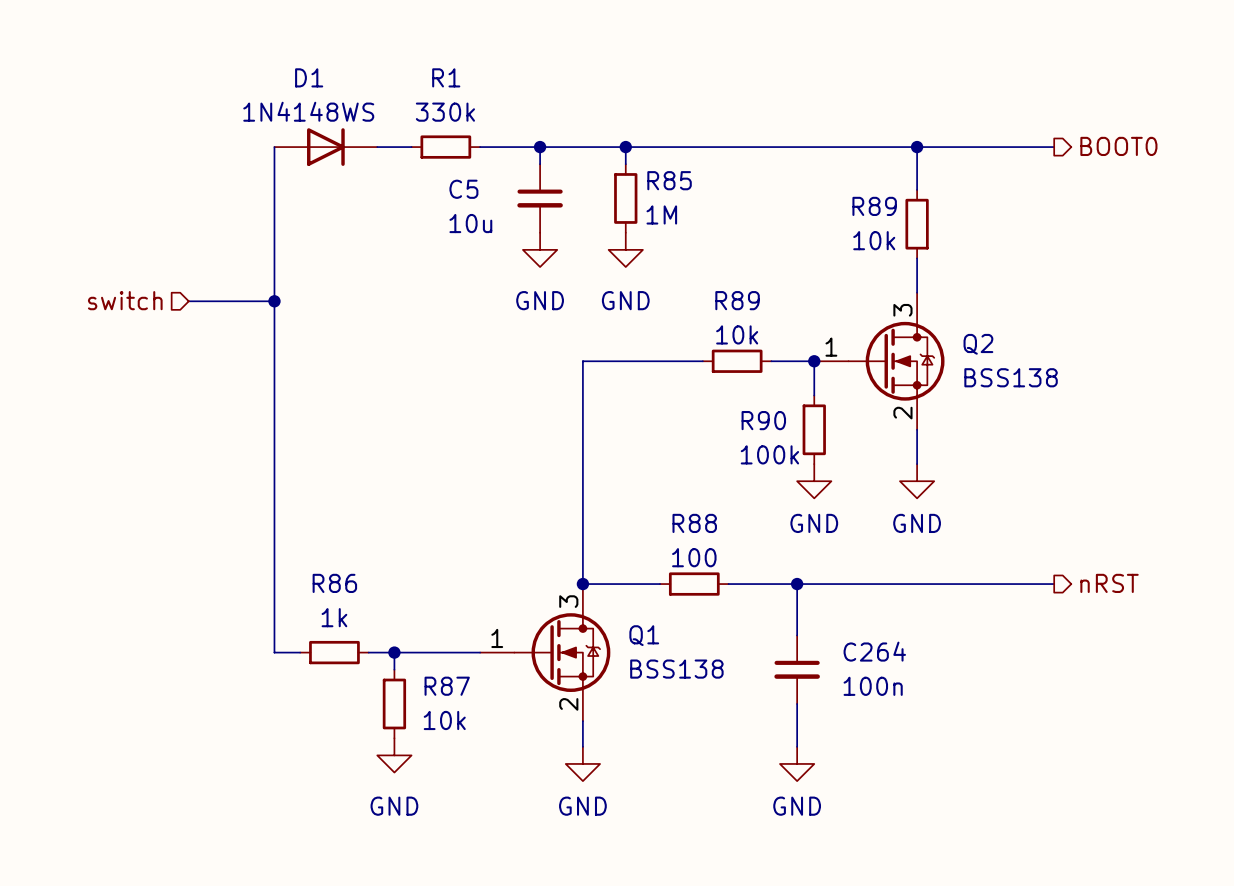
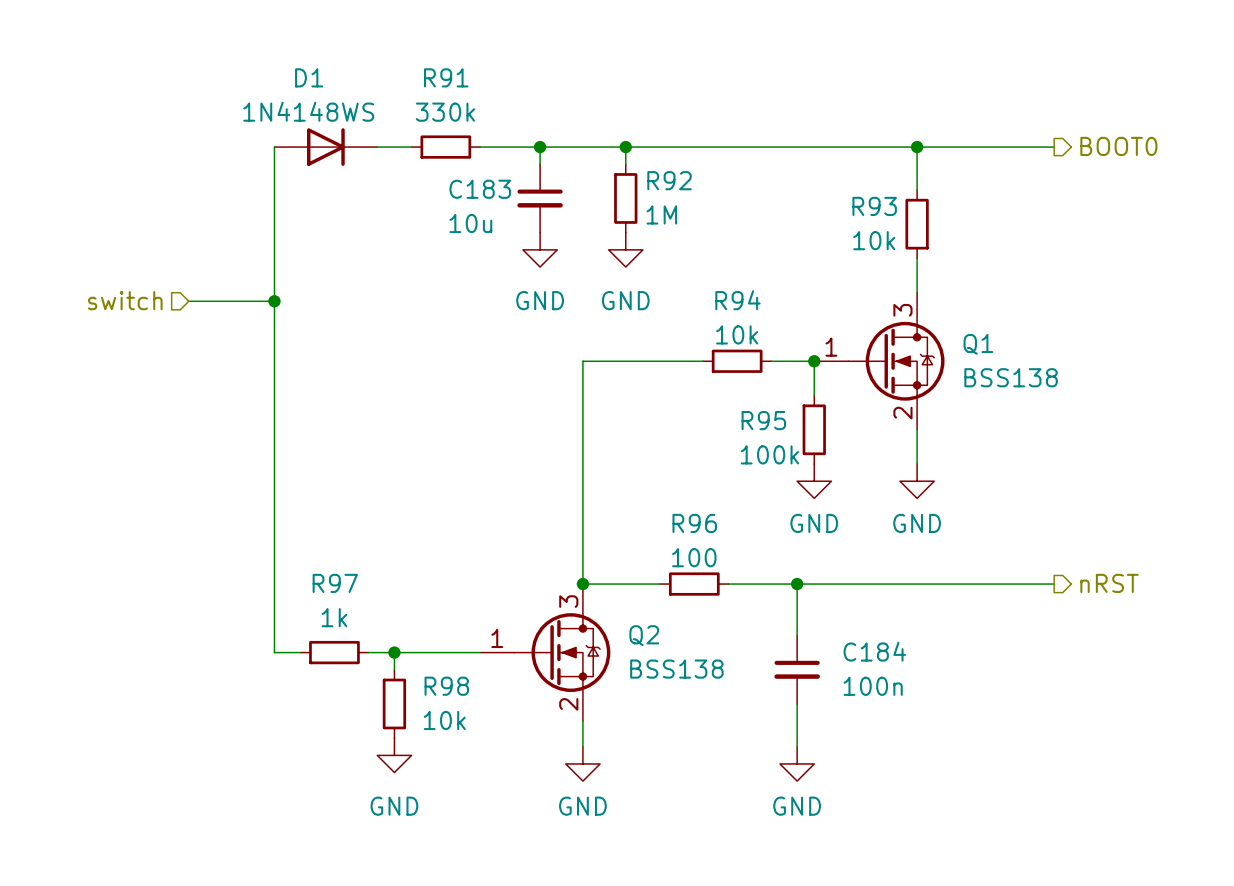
R1 name: R1 (446, 77) -> R91 (446, 77)
R85 name: R85 (669, 180) -> R92 (669, 180)
C5 name: C5 (463, 189) -> C183 (480, 189)
R89 name: R89 (874, 206) -> R93 (874, 206)
R89 name: R89 (737, 300) -> R94 (737, 300)
Q2 name: Q2 (978, 344) -> Q1 (978, 344)
R90 name: R90 (763, 420) -> R95 (763, 420)
R88 name: R88 (694, 523) -> R96 (694, 523)
R86 name: R86 (334, 583) -> R97 (335, 583)
Q1 name: Q1 (644, 635) -> Q2 (644, 635)
C264 name: C264 (874, 651) -> C184 (874, 651)
R87 name: R87 (447, 686) -> R98 (446, 686)

